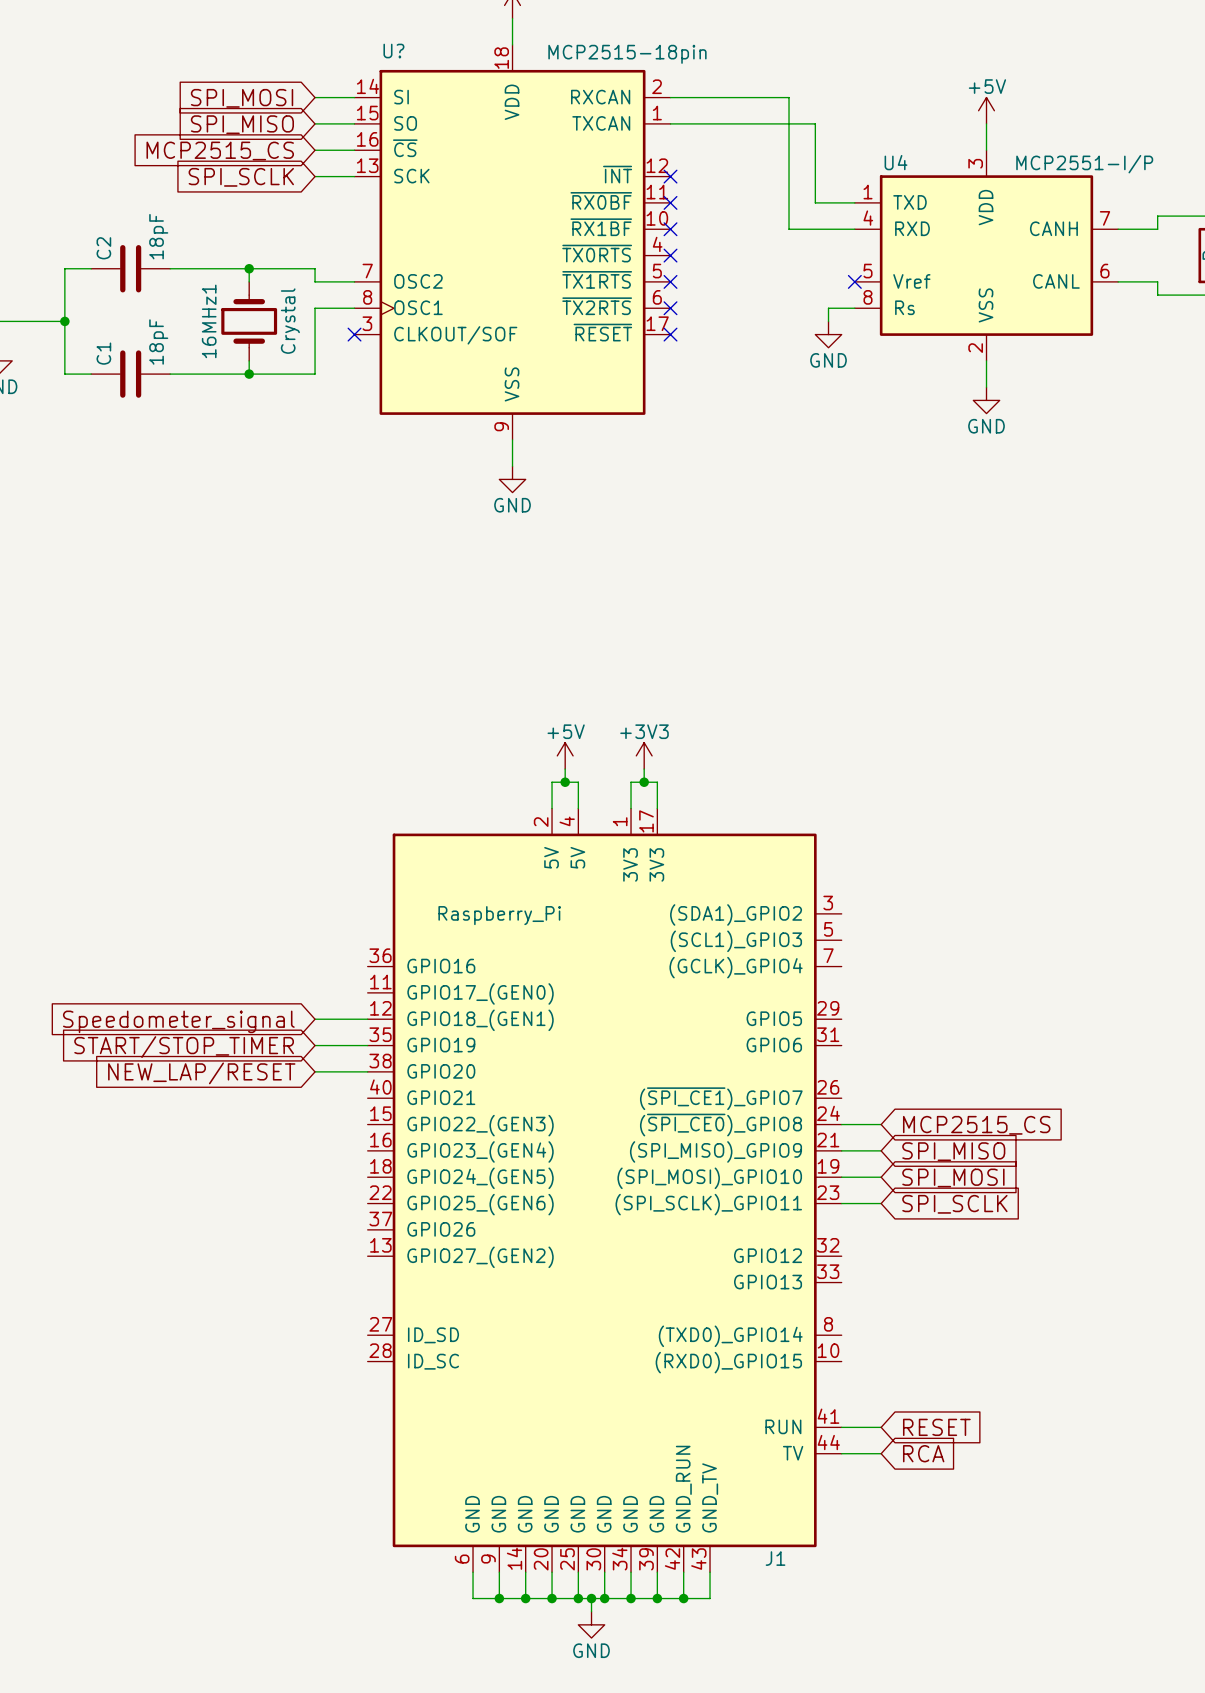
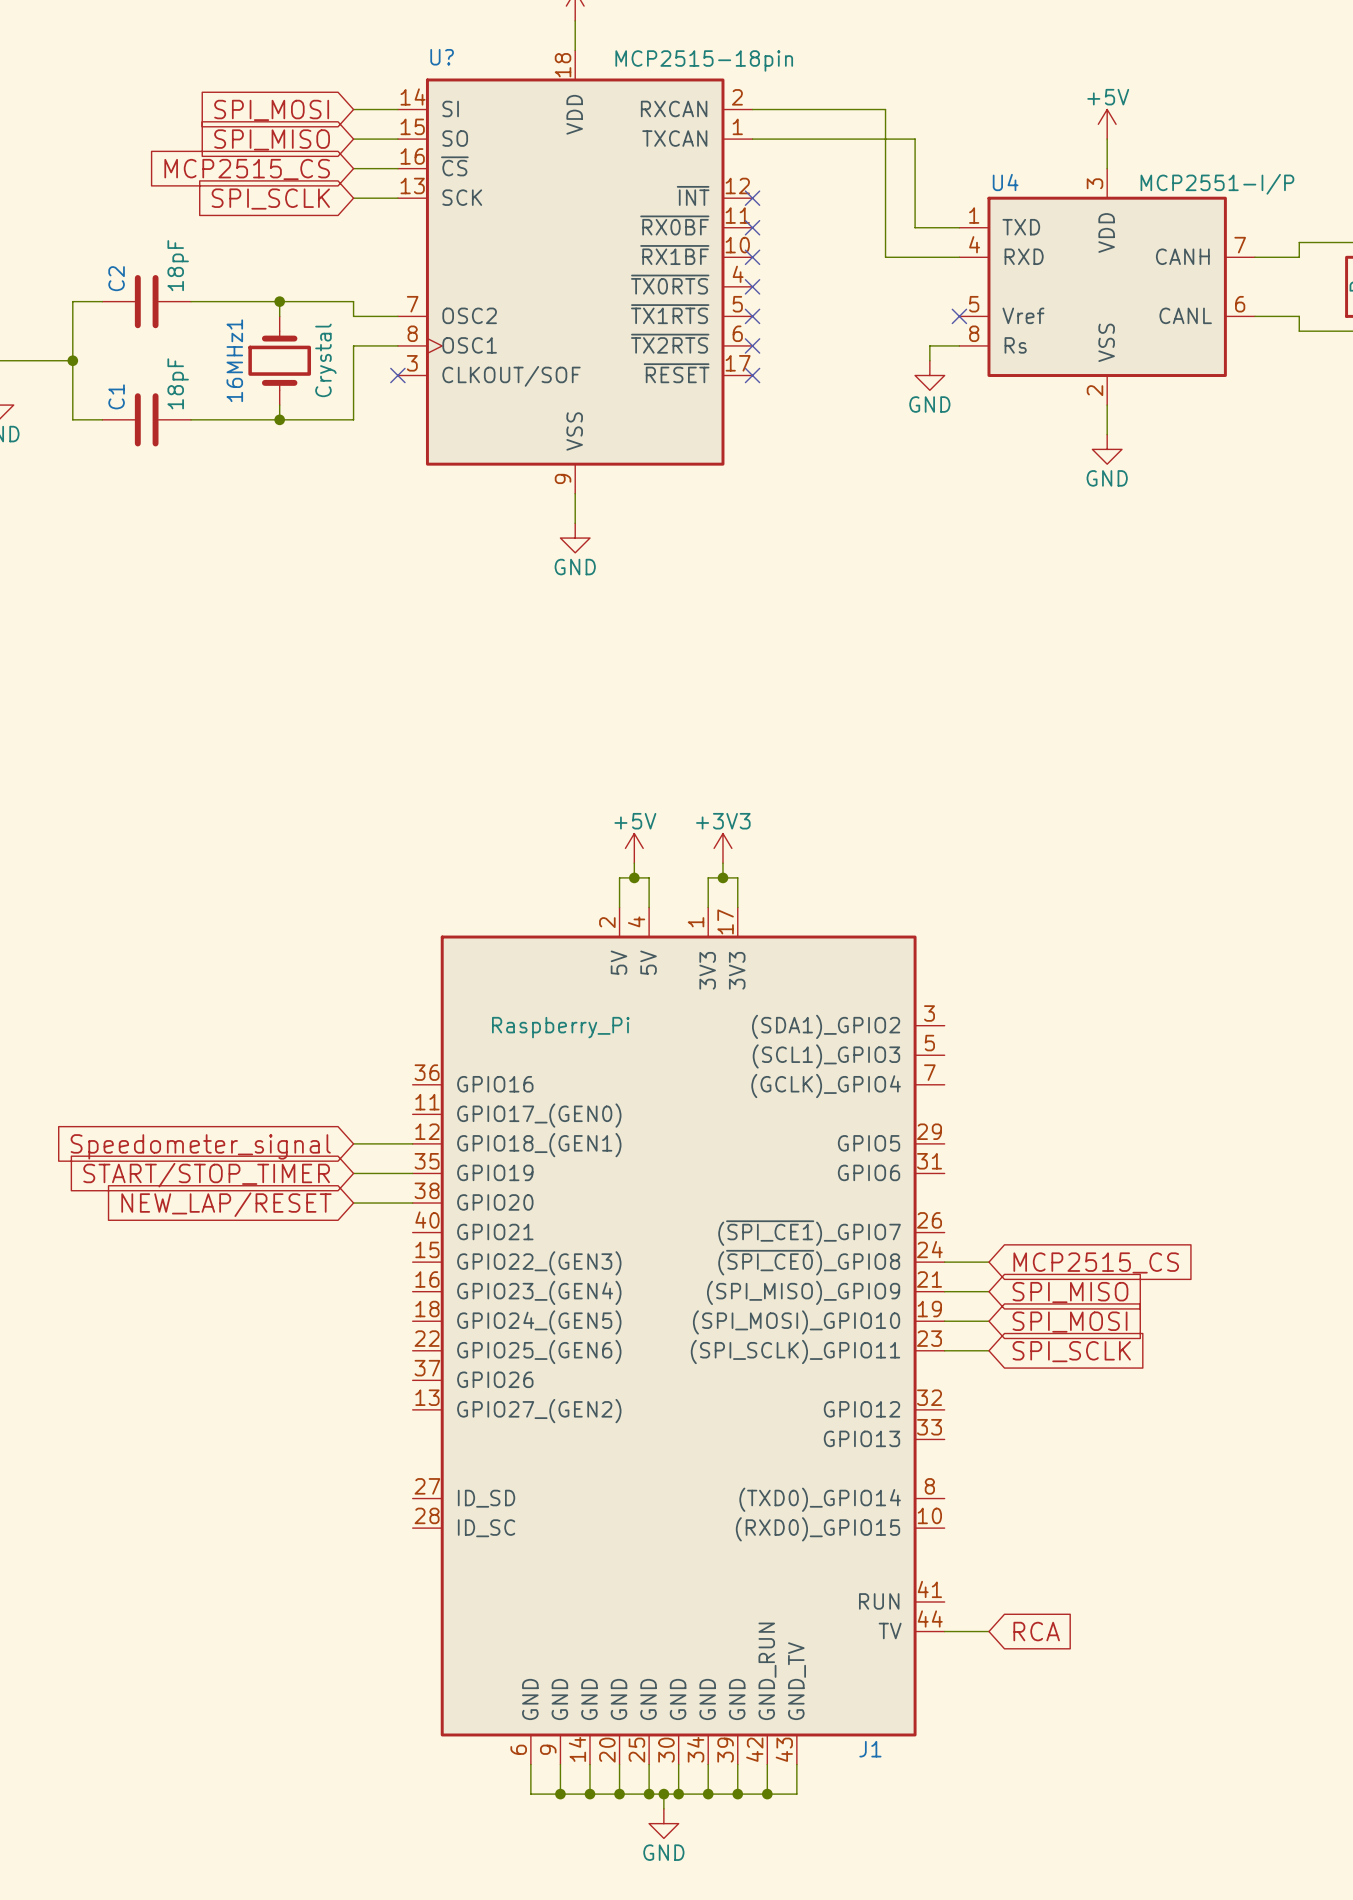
wire: (841, 1427) (881, 1427) -> none
global label: RESET (936, 1427) -> none

